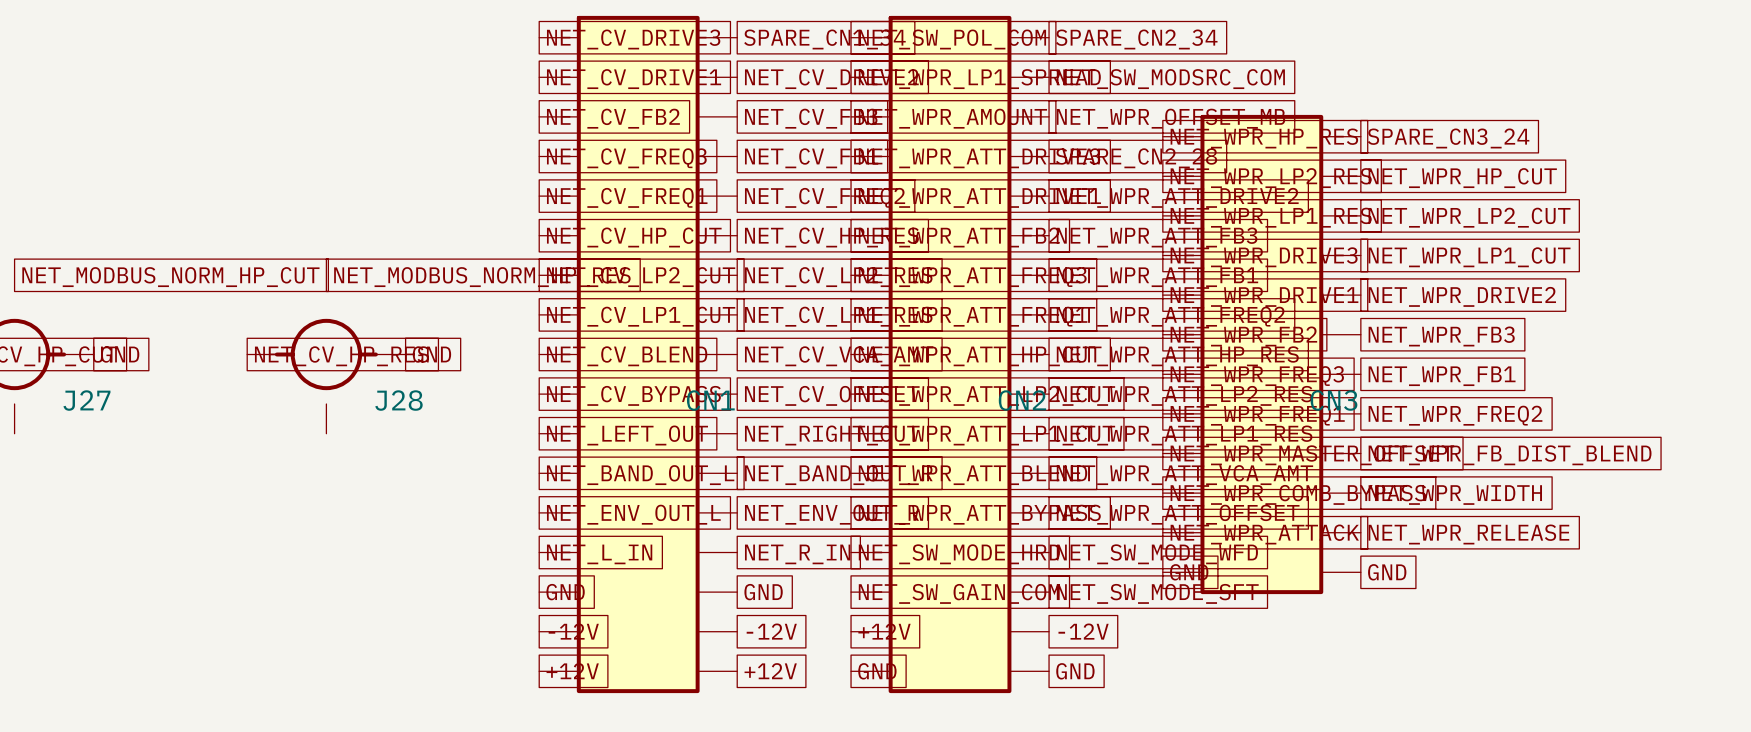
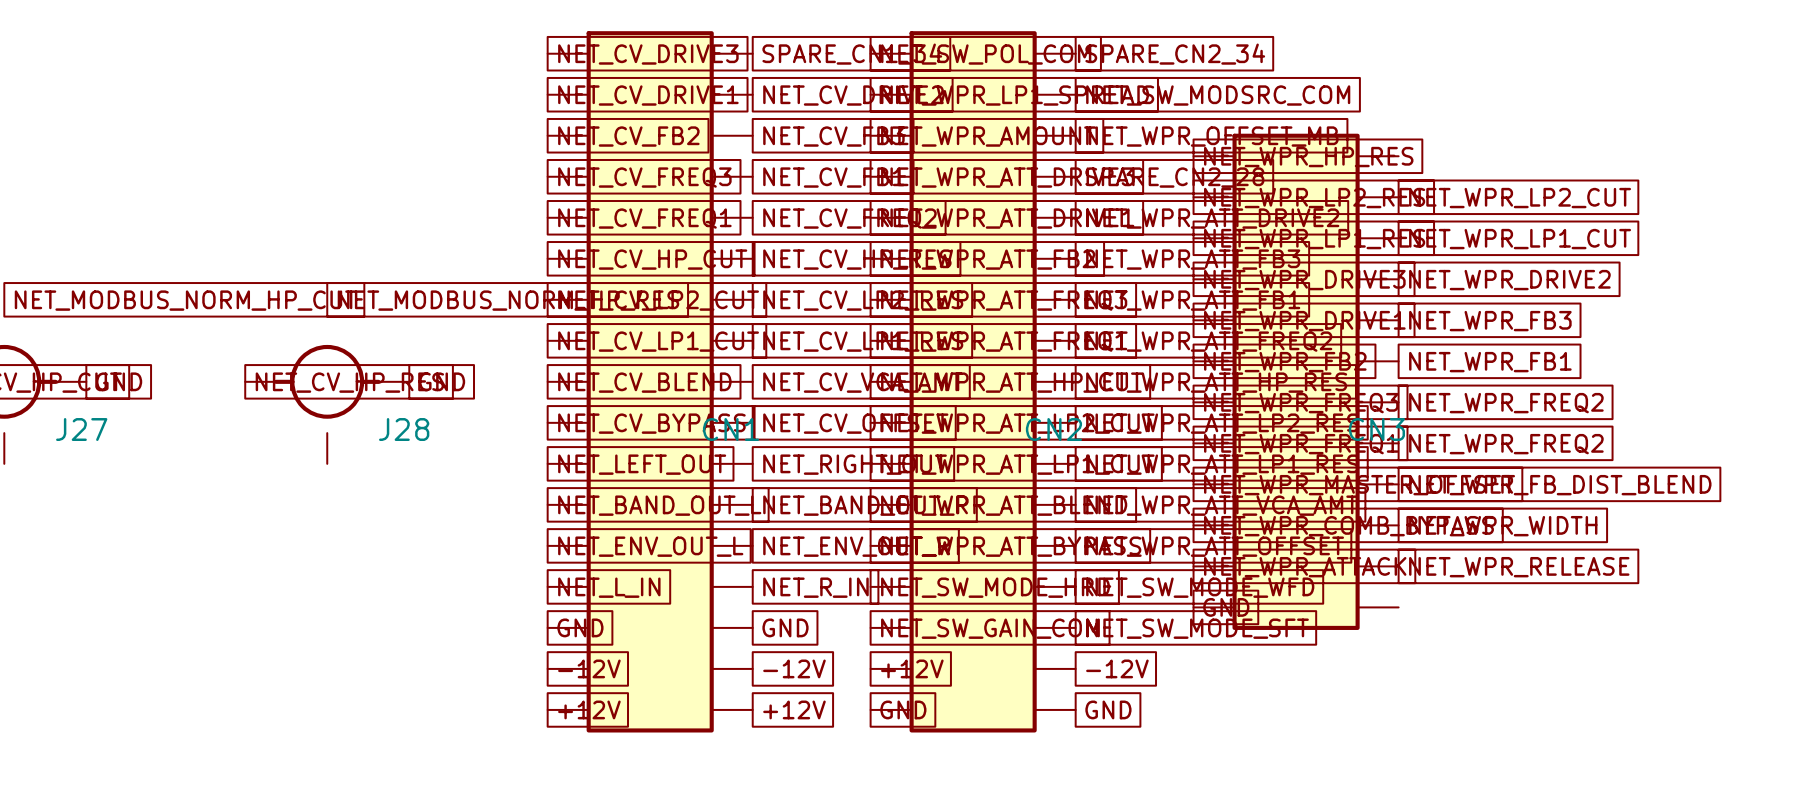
global label: SPARE_CN3_24 (1448, 138) -> none
global label: NET_WPR_HP_CUT (1462, 178) -> NET_WPR_LP2_CUT (1520, 198)
global label: NET_WPR_LP2_CUT (1469, 217) -> NET_WPR_LP1_CUT (1520, 239)
global label: NET_WPR_LP1_CUT (1469, 257) -> NET_WPR_DRIVE2 (1509, 280)
global label: NET_WPR_DRIVE2 (1462, 296) -> NET_WPR_FB3 (1490, 321)
global label: NET_WPR_FB3 (1441, 336) -> NET_WPR_FB1 (1490, 362)
global label: NET_WPR_FB1 (1442, 376) -> NET_WPR_FREQ2 (1506, 403)
global label: GND (1387, 572) -> none

